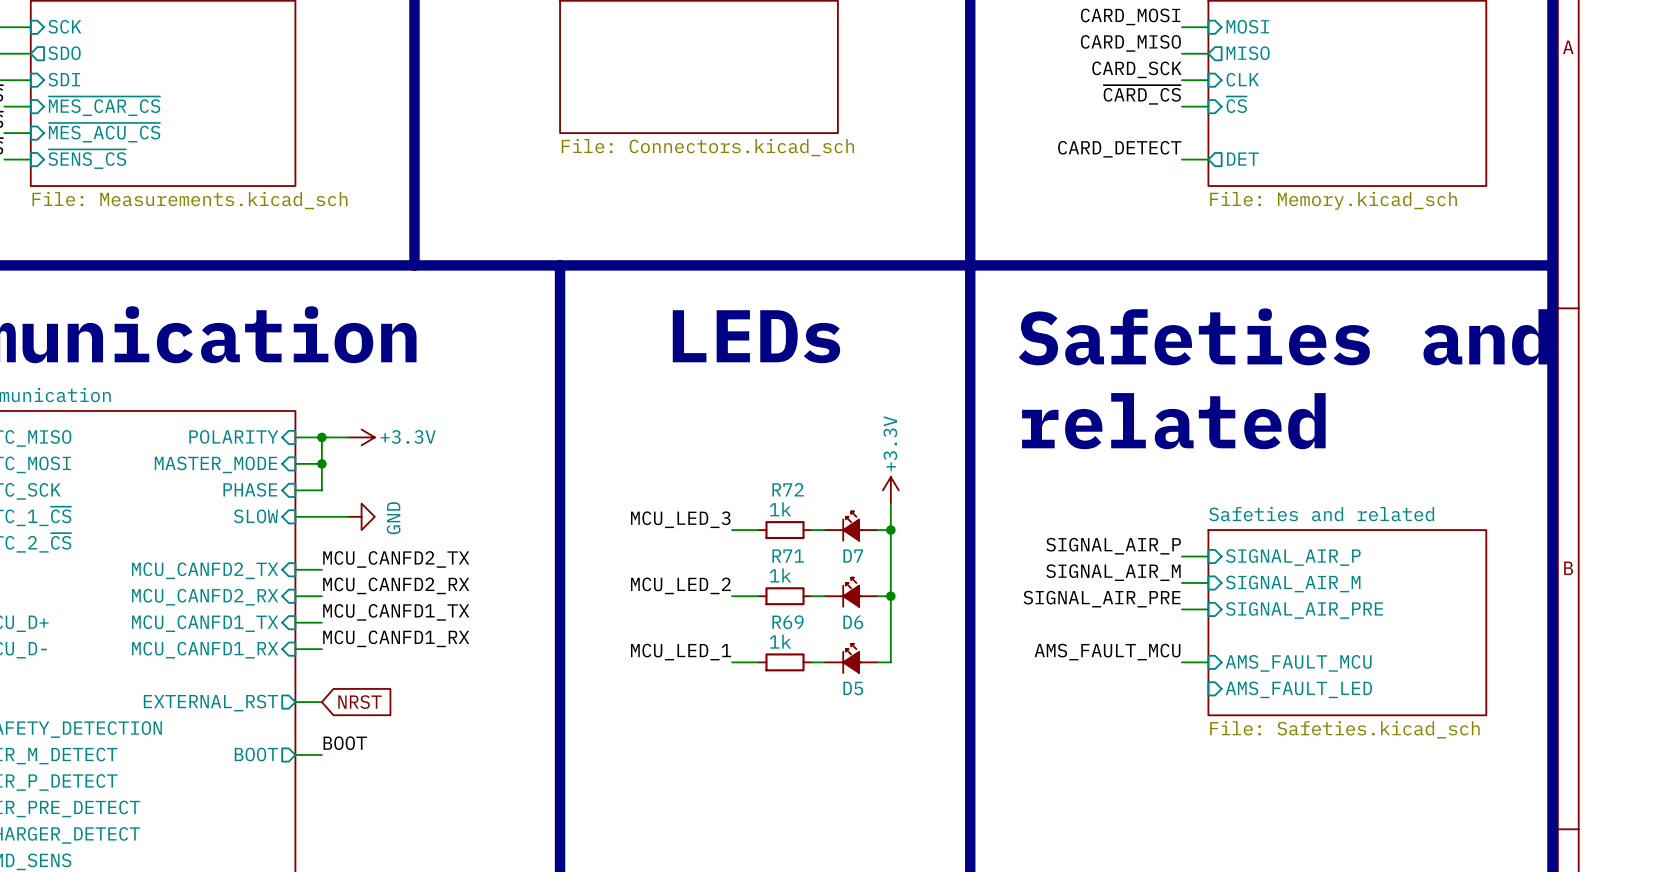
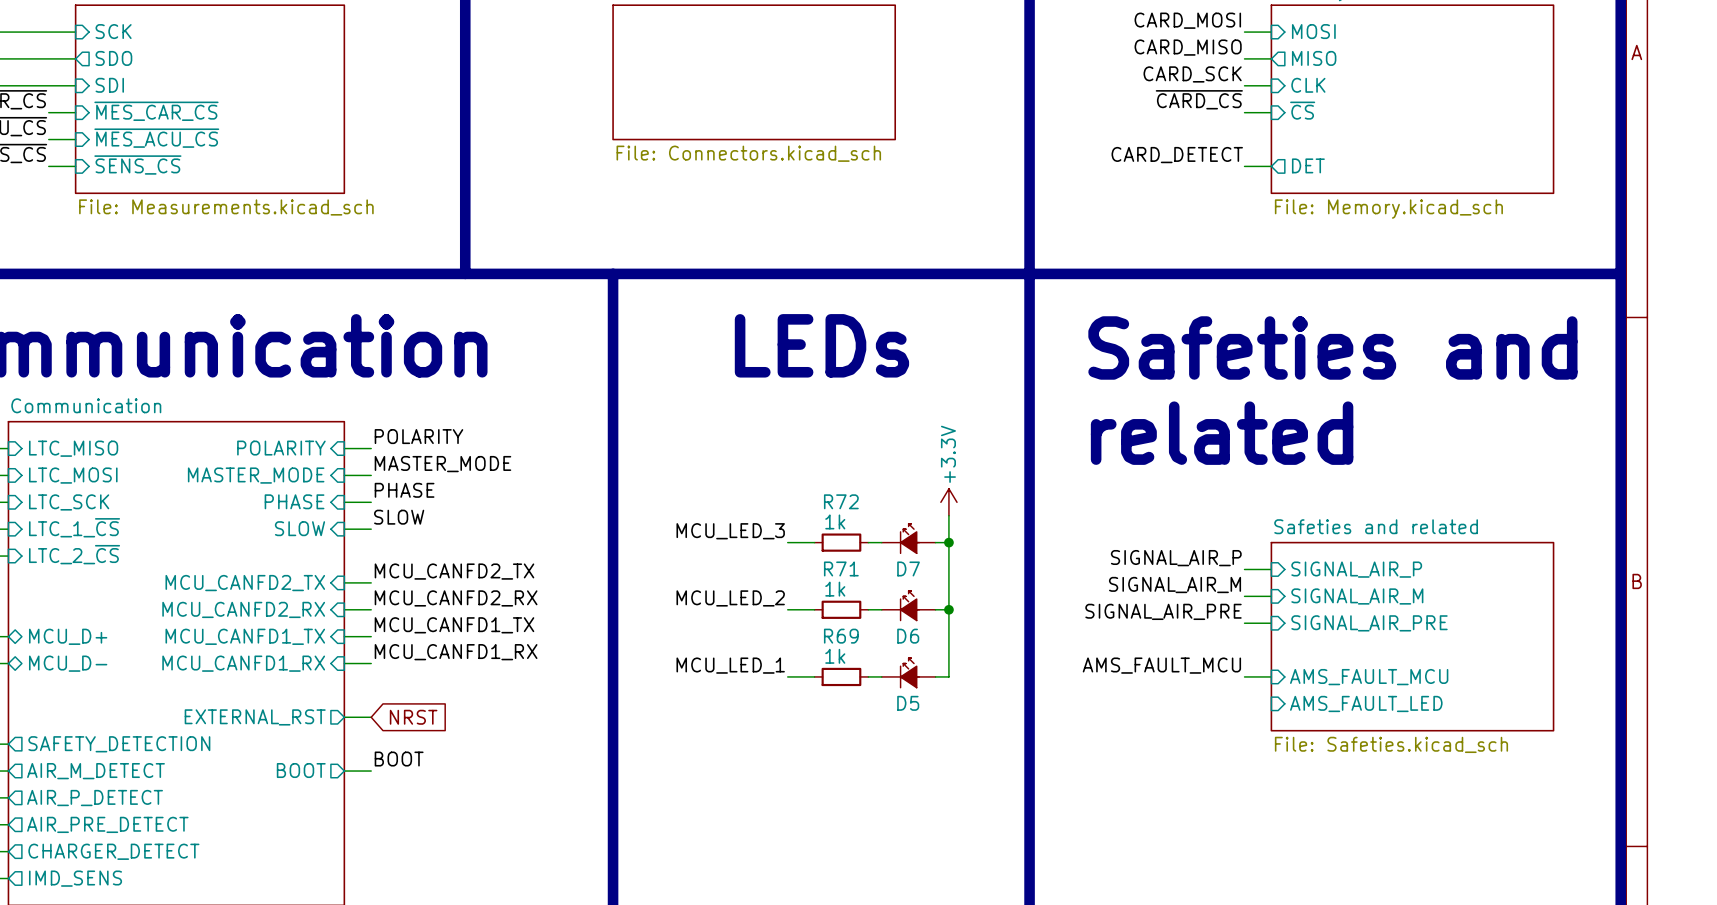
label: none -> POLARITY (418, 436)
junction: (321, 437) -> none
wire: (348, 437) (321, 437) (321, 490) -> none
power symbol: +3.3V (361, 437) -> none
label: none -> MASTER_MODE (442, 464)
junction: (321, 463) -> none
label: none -> PHASE (404, 490)
label: none -> SLOW (399, 517)
wire: (321, 516) (348, 516) -> none
power symbol: GND (361, 516) -> none

